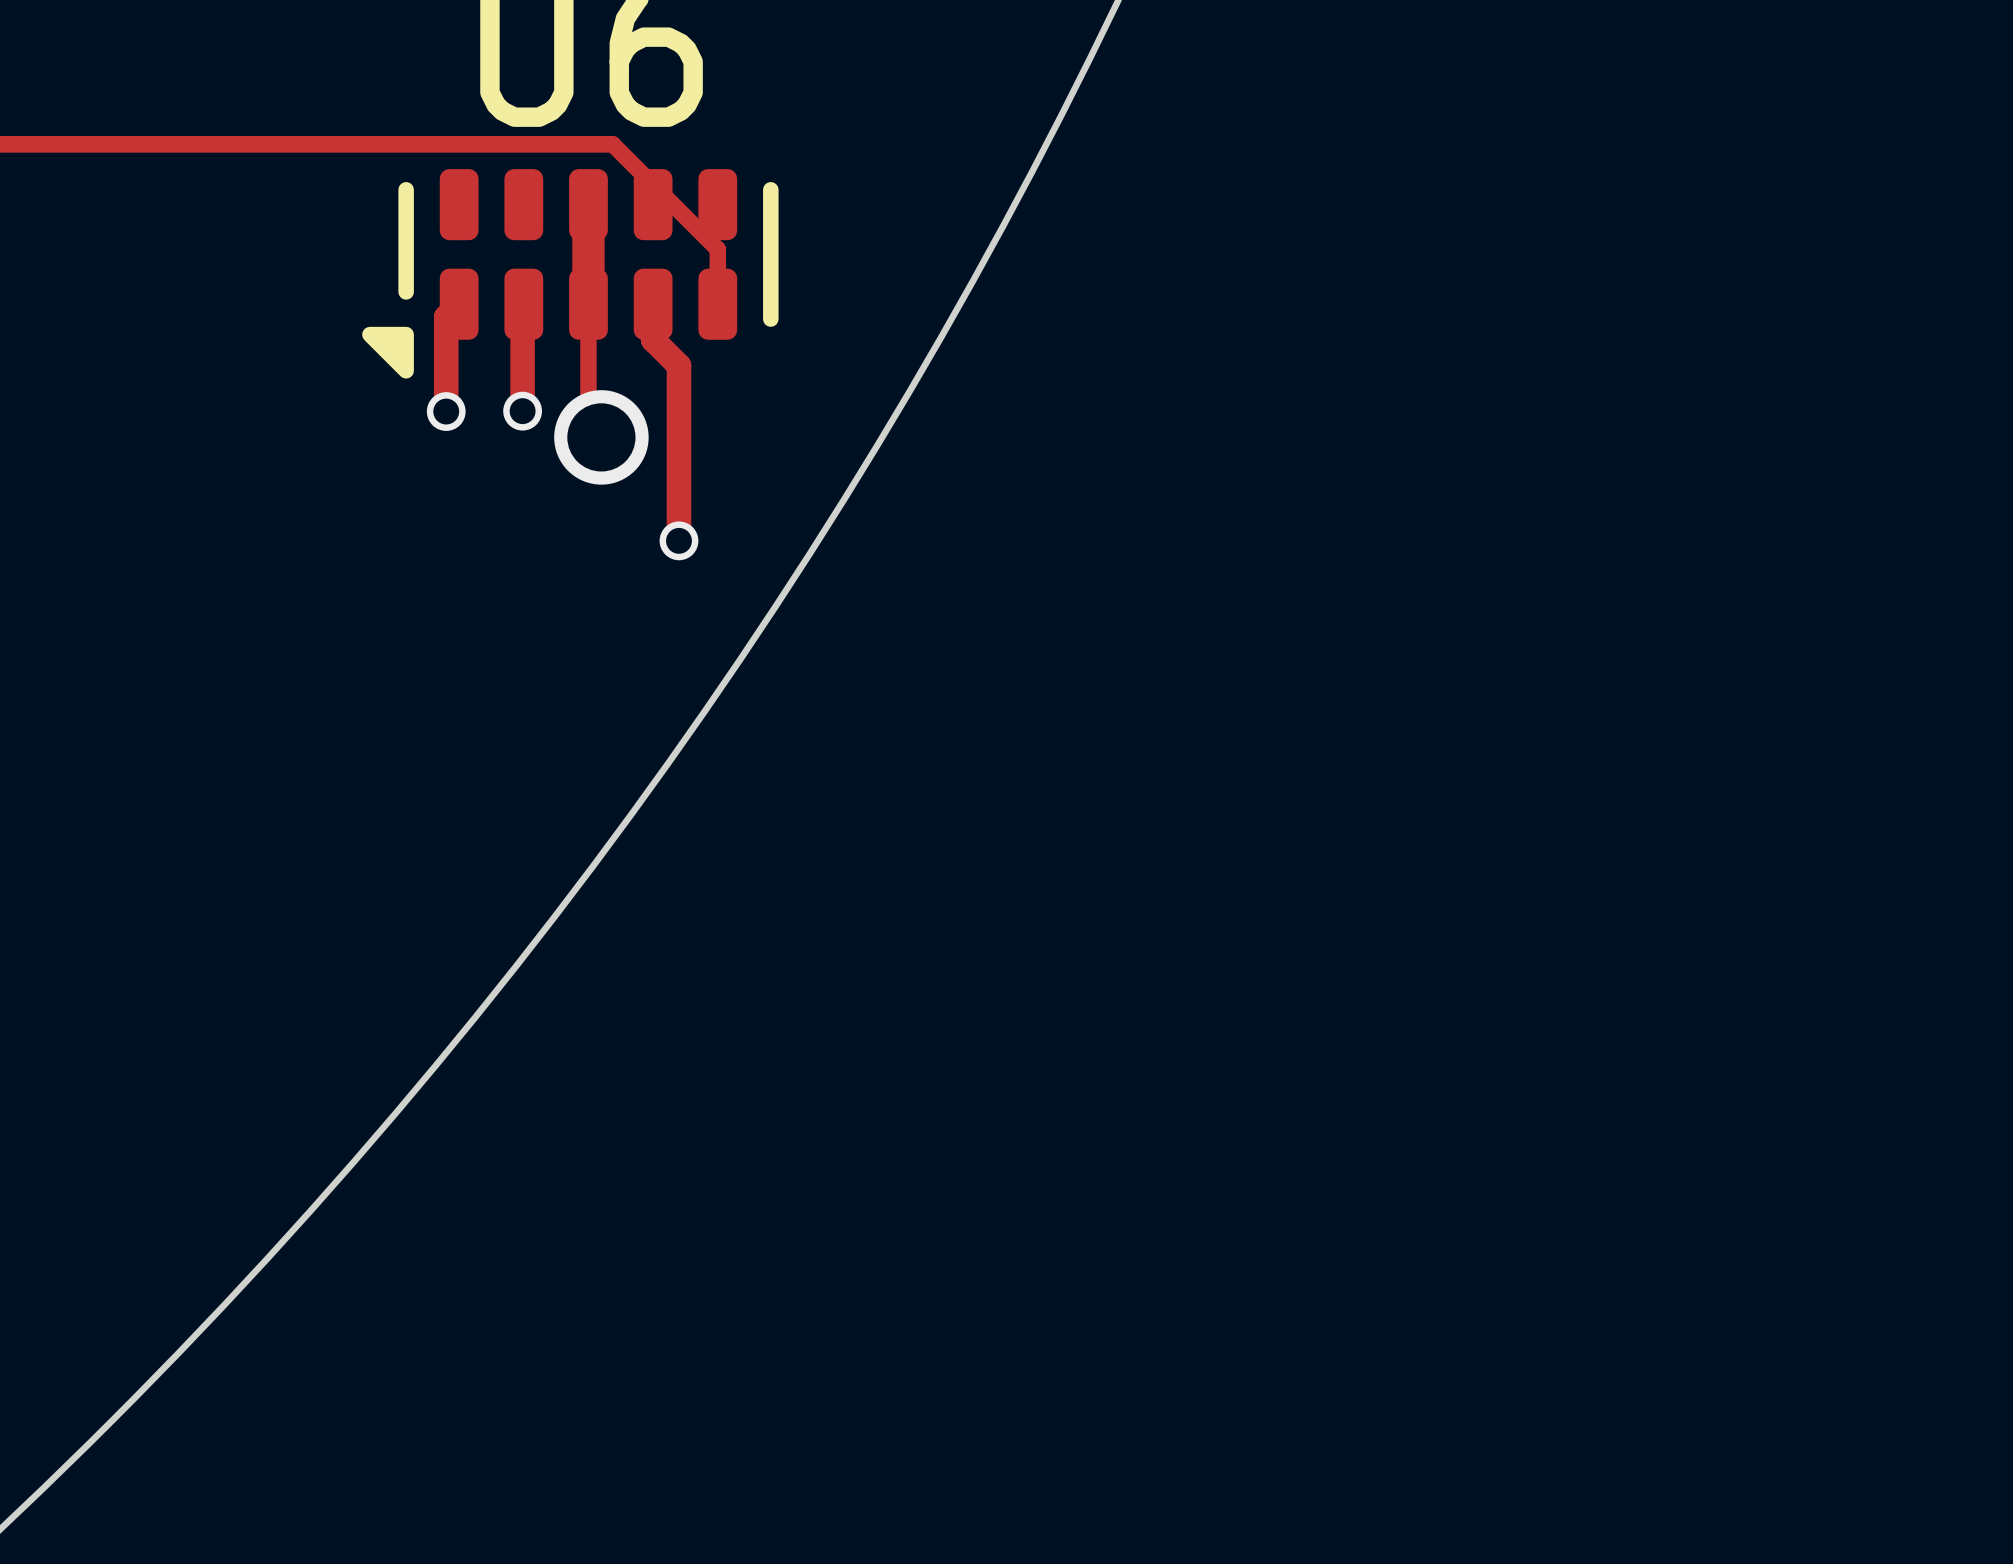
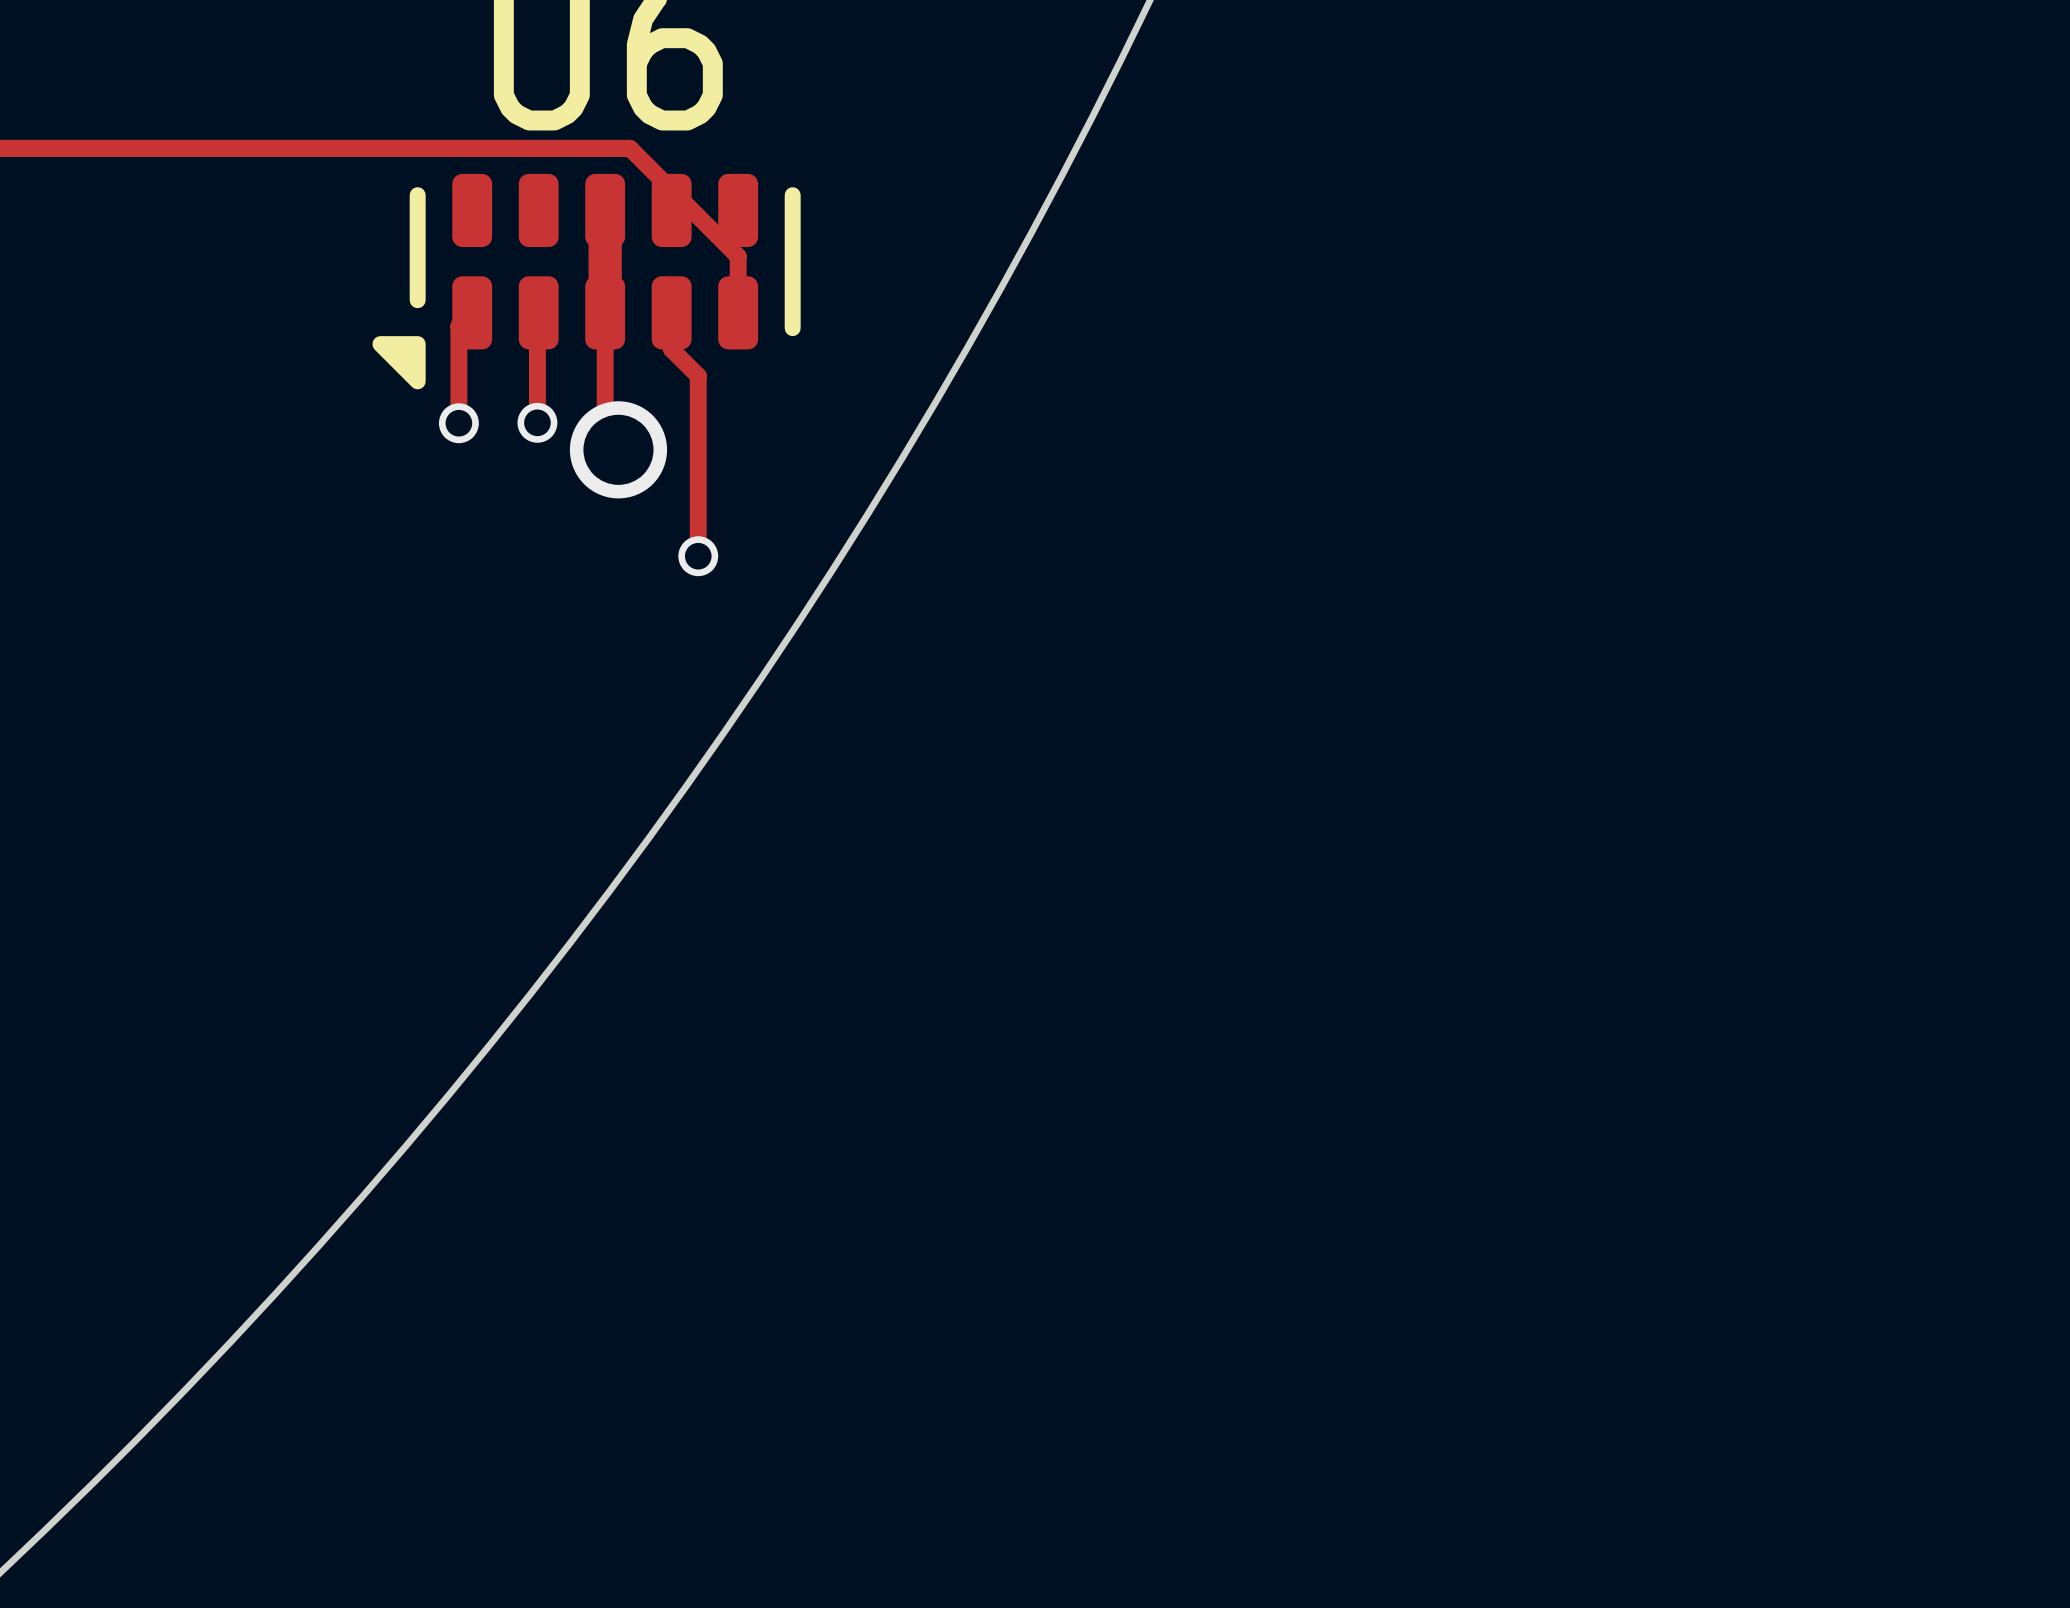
track width: thick (459, 304) (446, 317) (446, 411) -> thin (472, 312) (458, 326) (458, 423)
track width: thick (653, 304) (653, 339) (678, 365) (678, 540) -> thin (671, 312) (671, 349) (698, 376) (698, 556)
track width: thick (522, 305) (522, 411) -> thin (537, 314) (537, 422)

